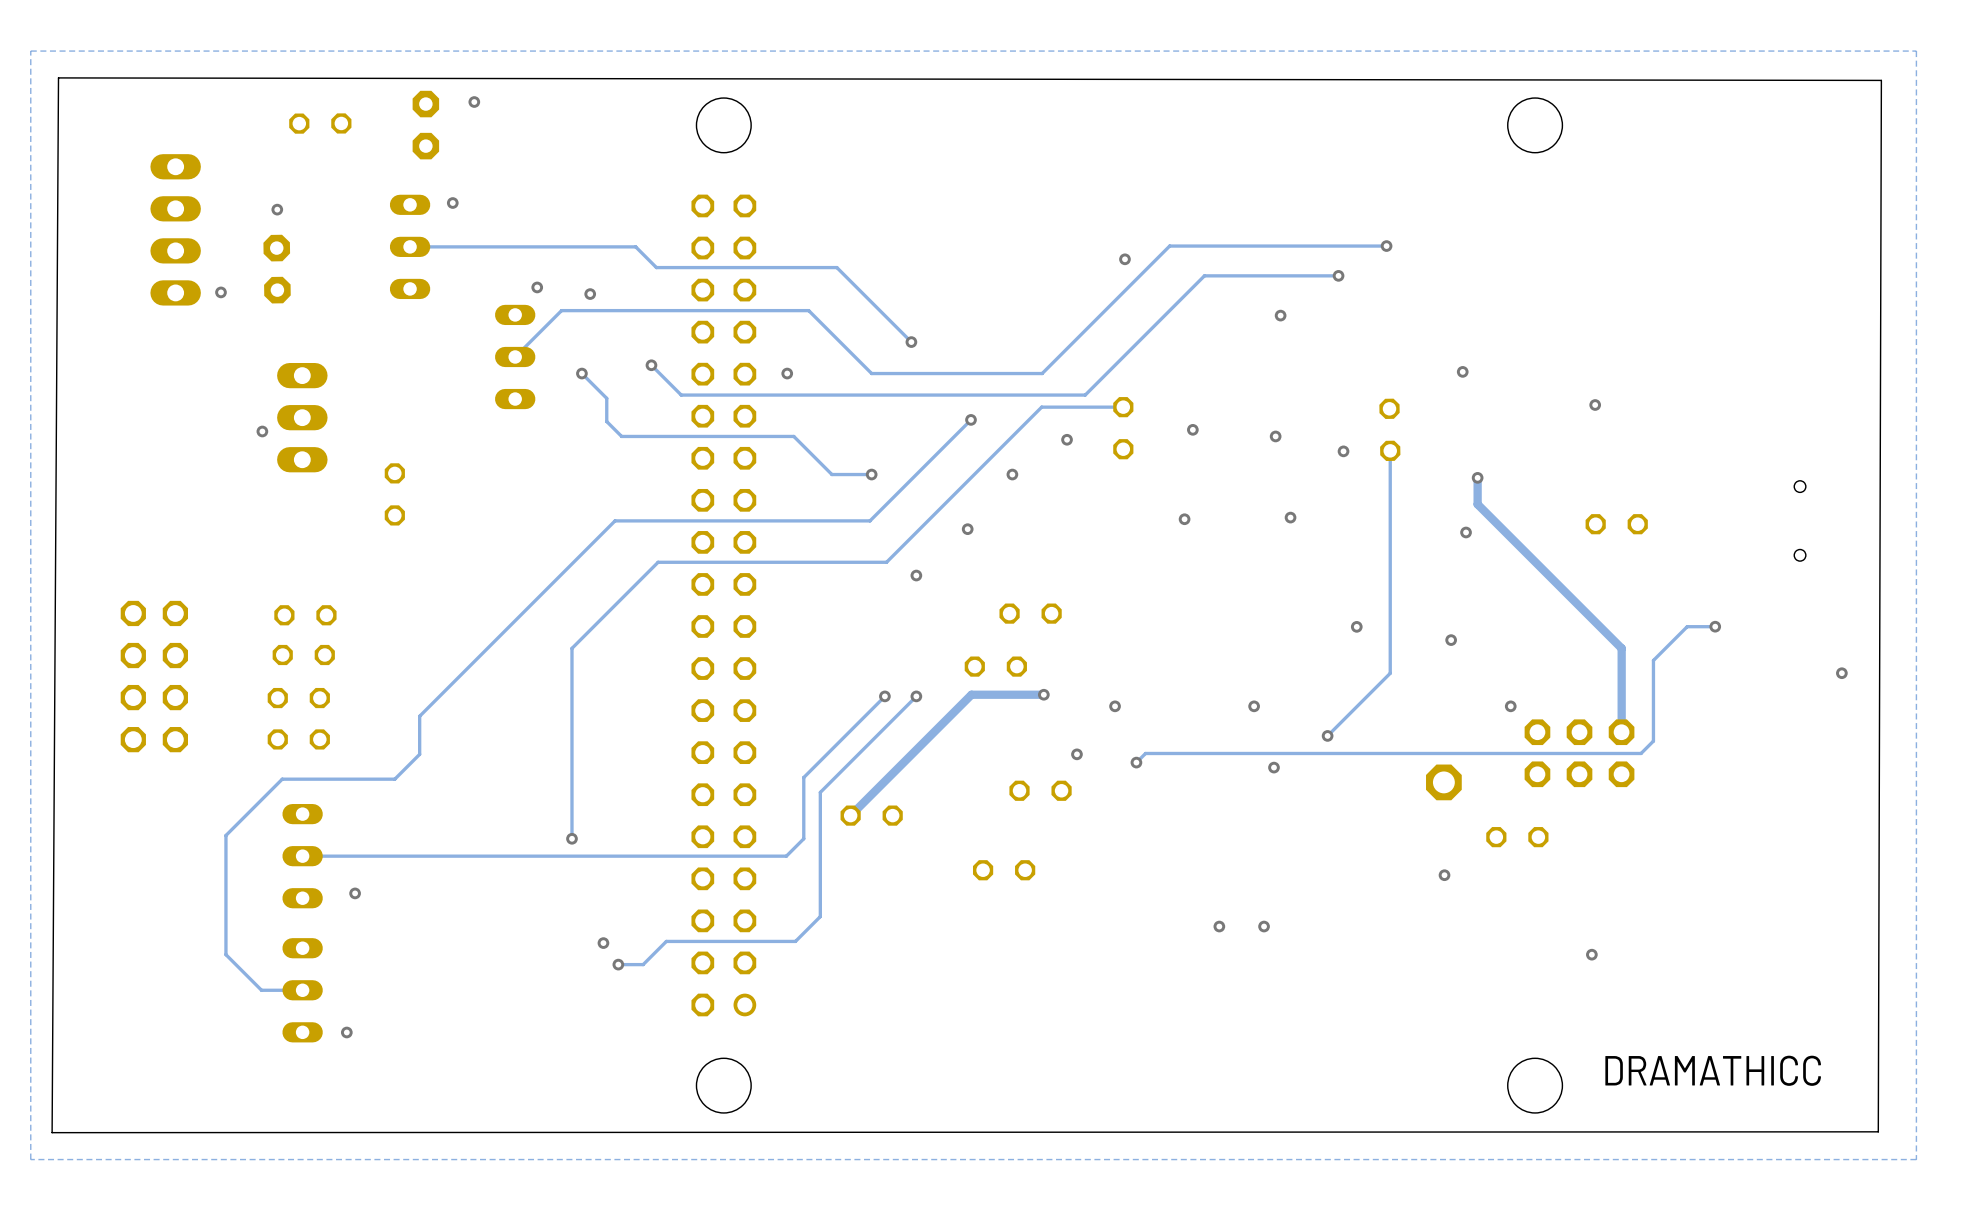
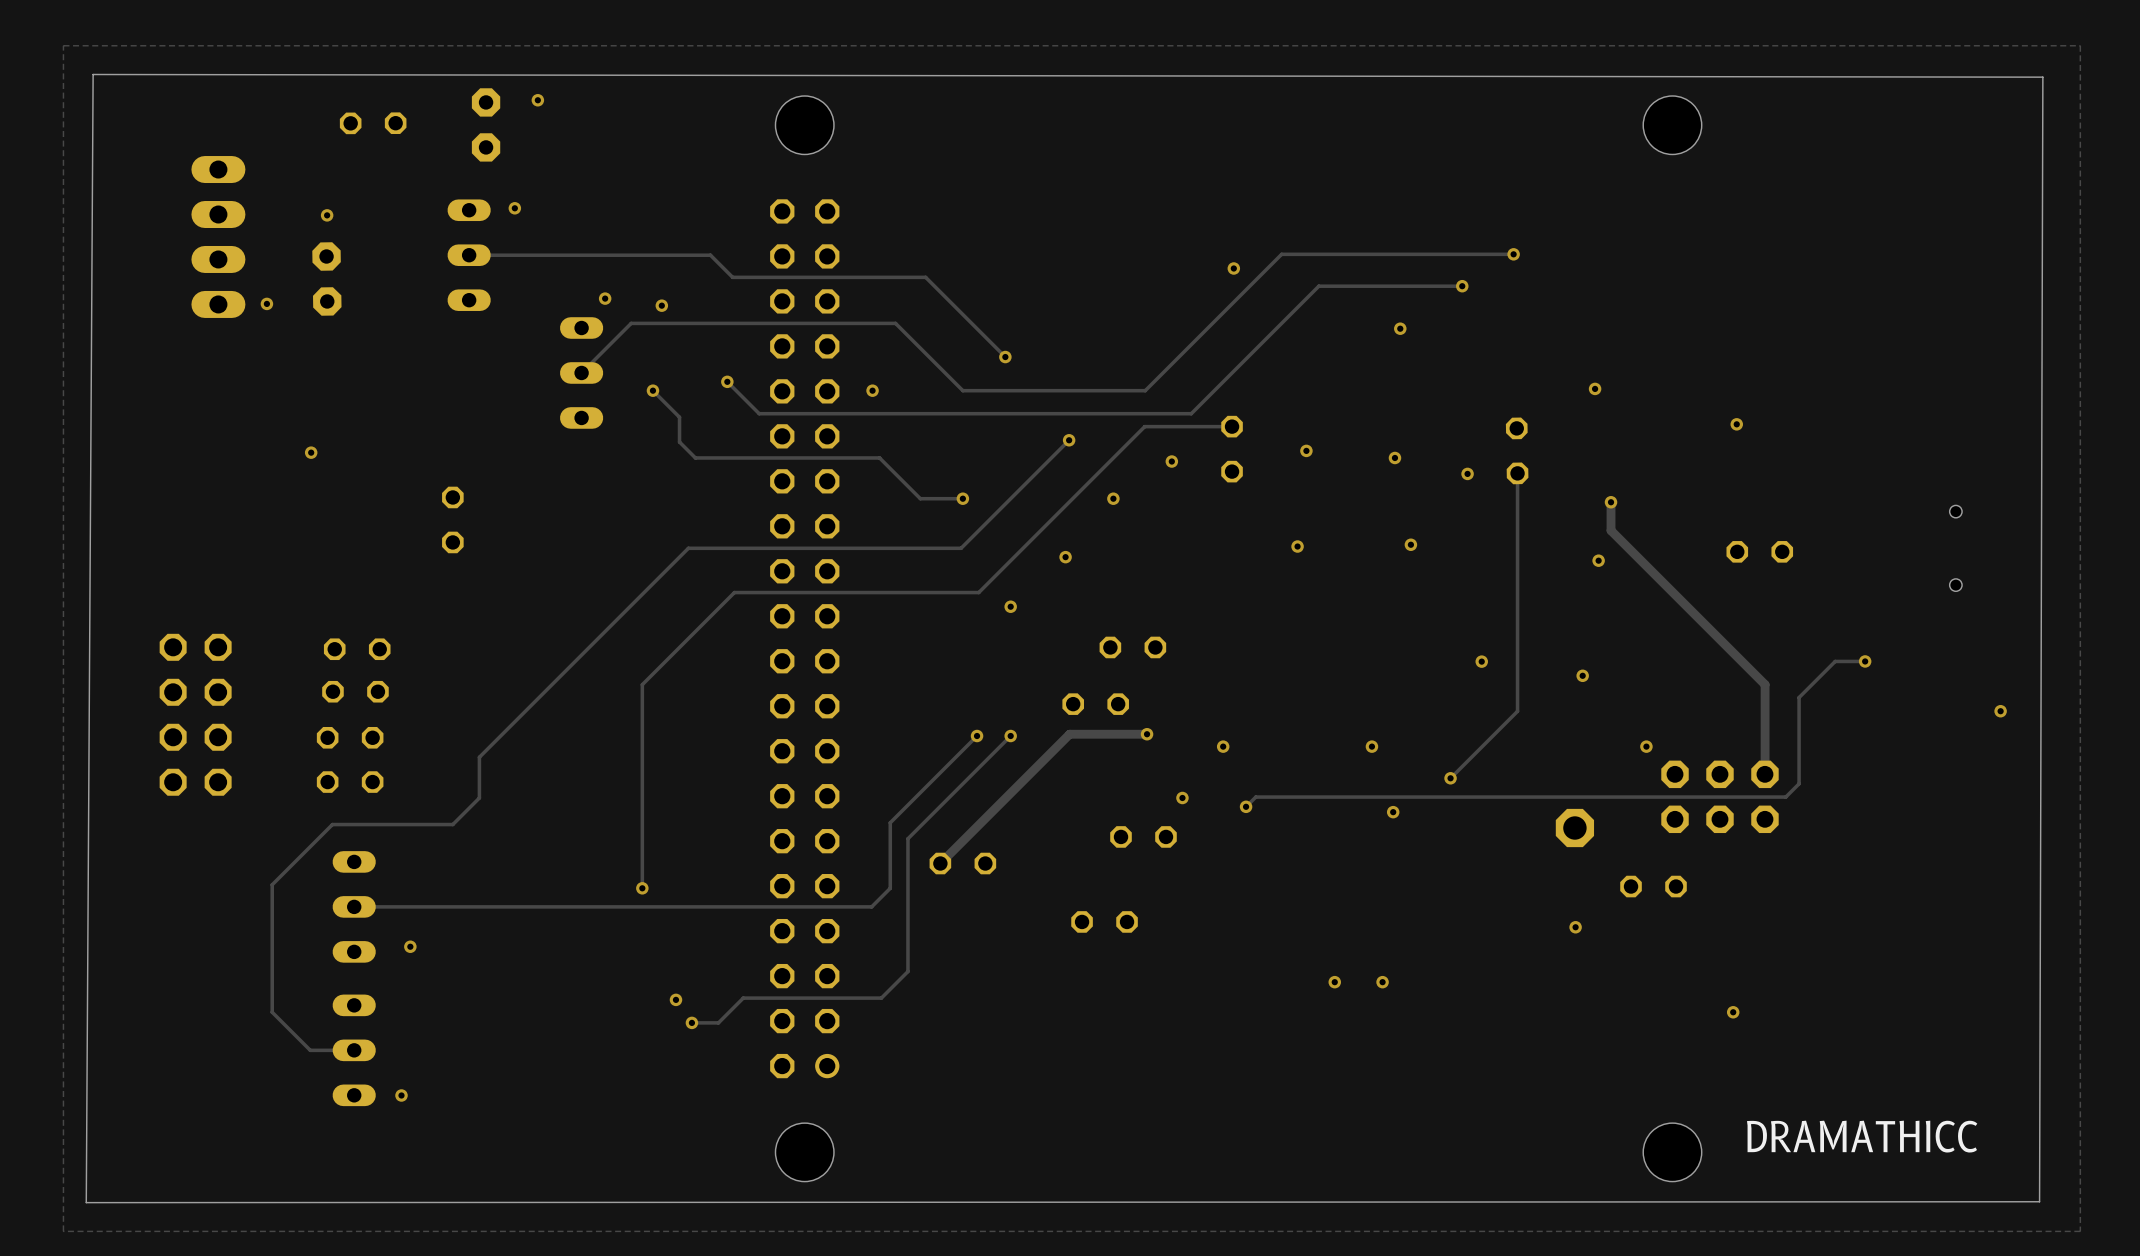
part: (302, 417) -> none

